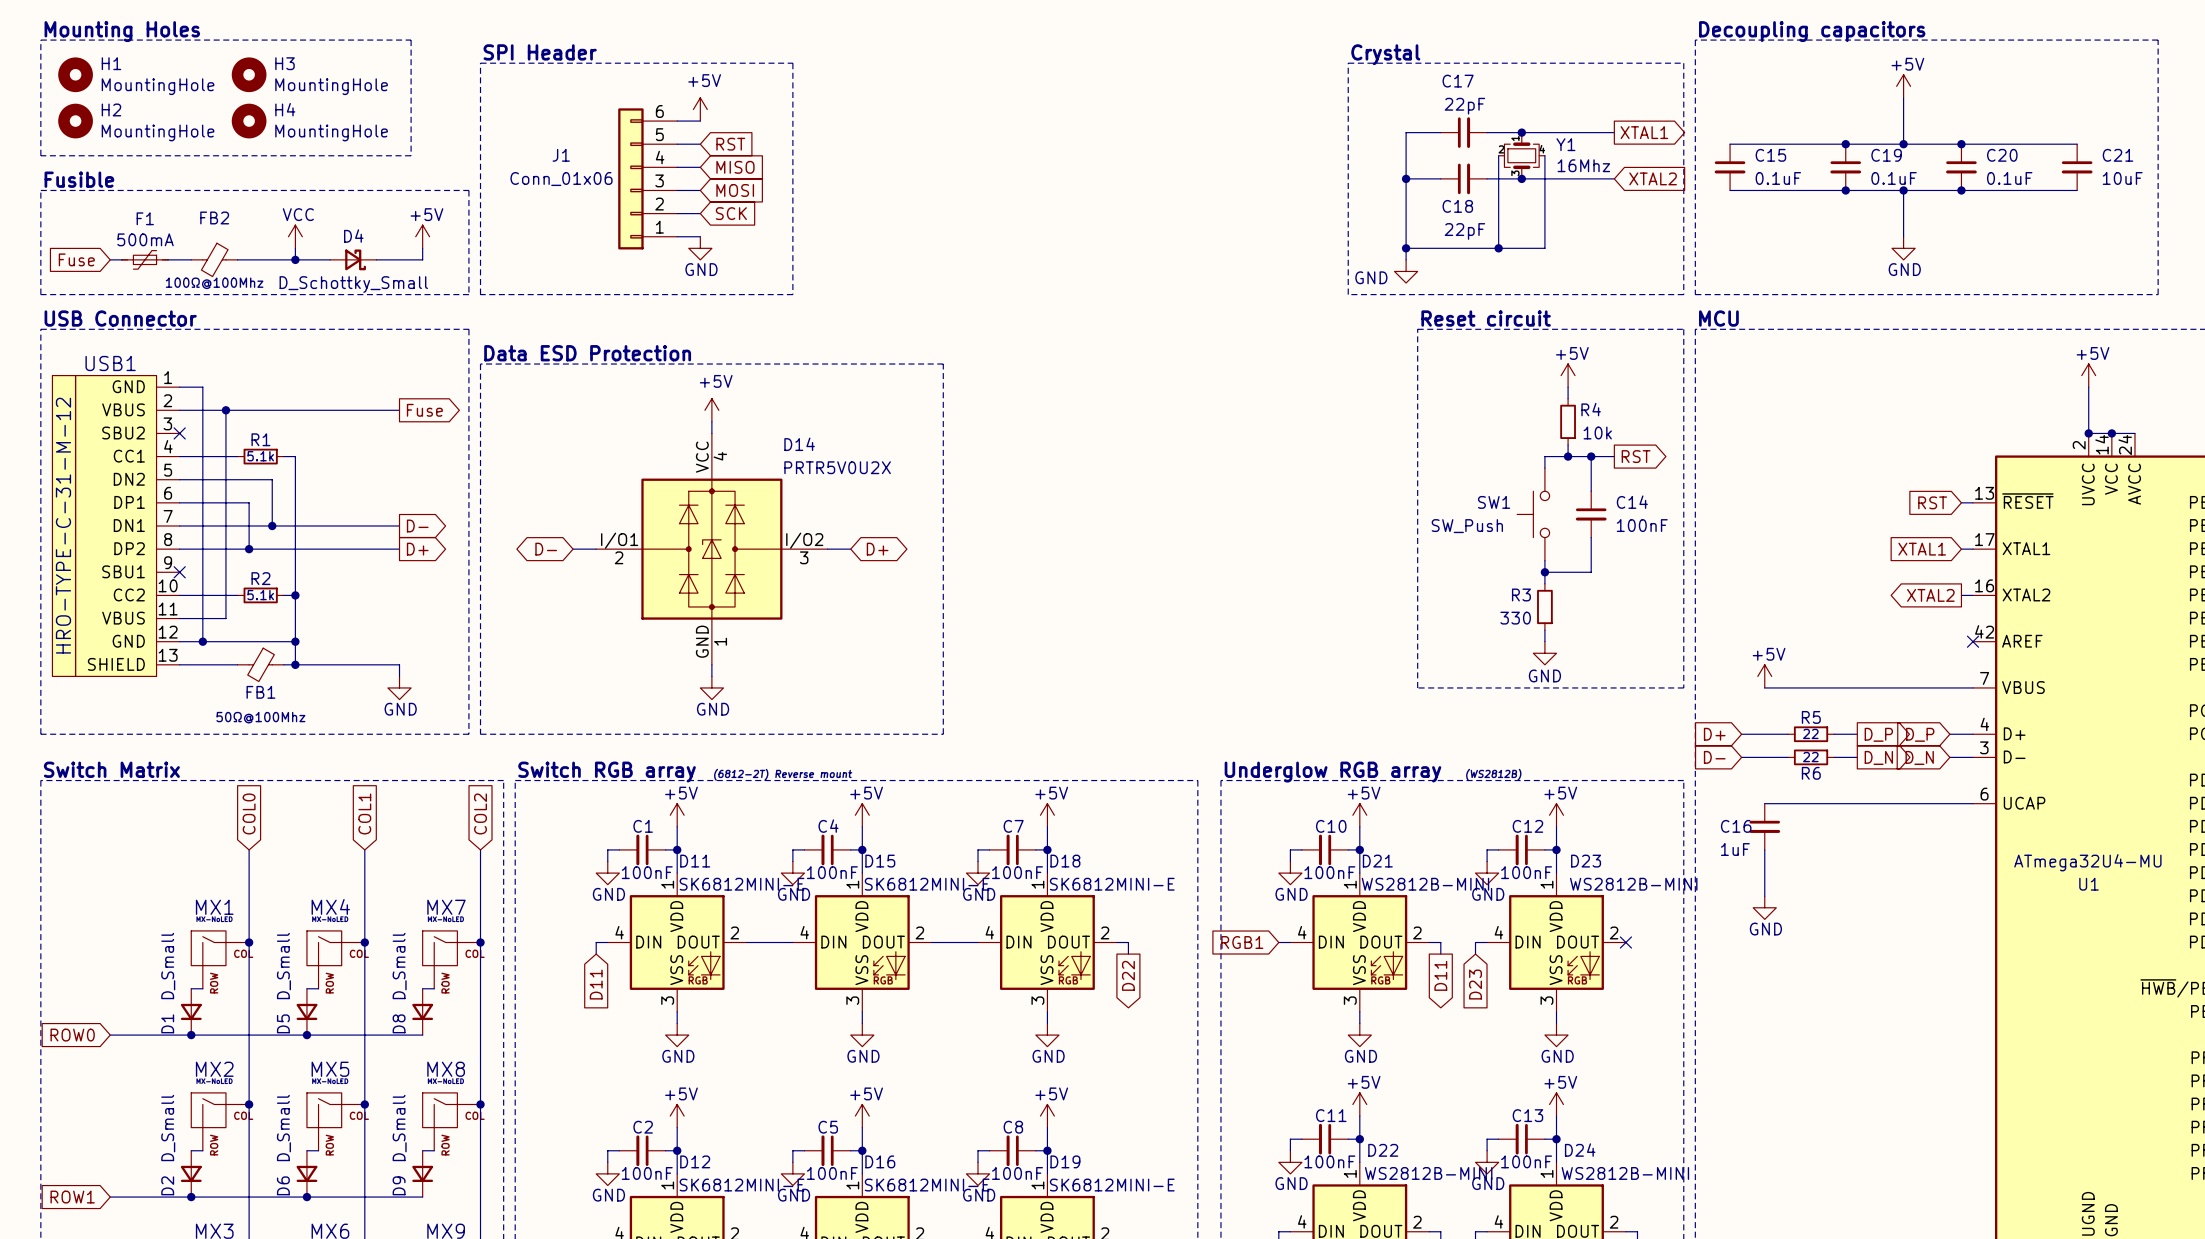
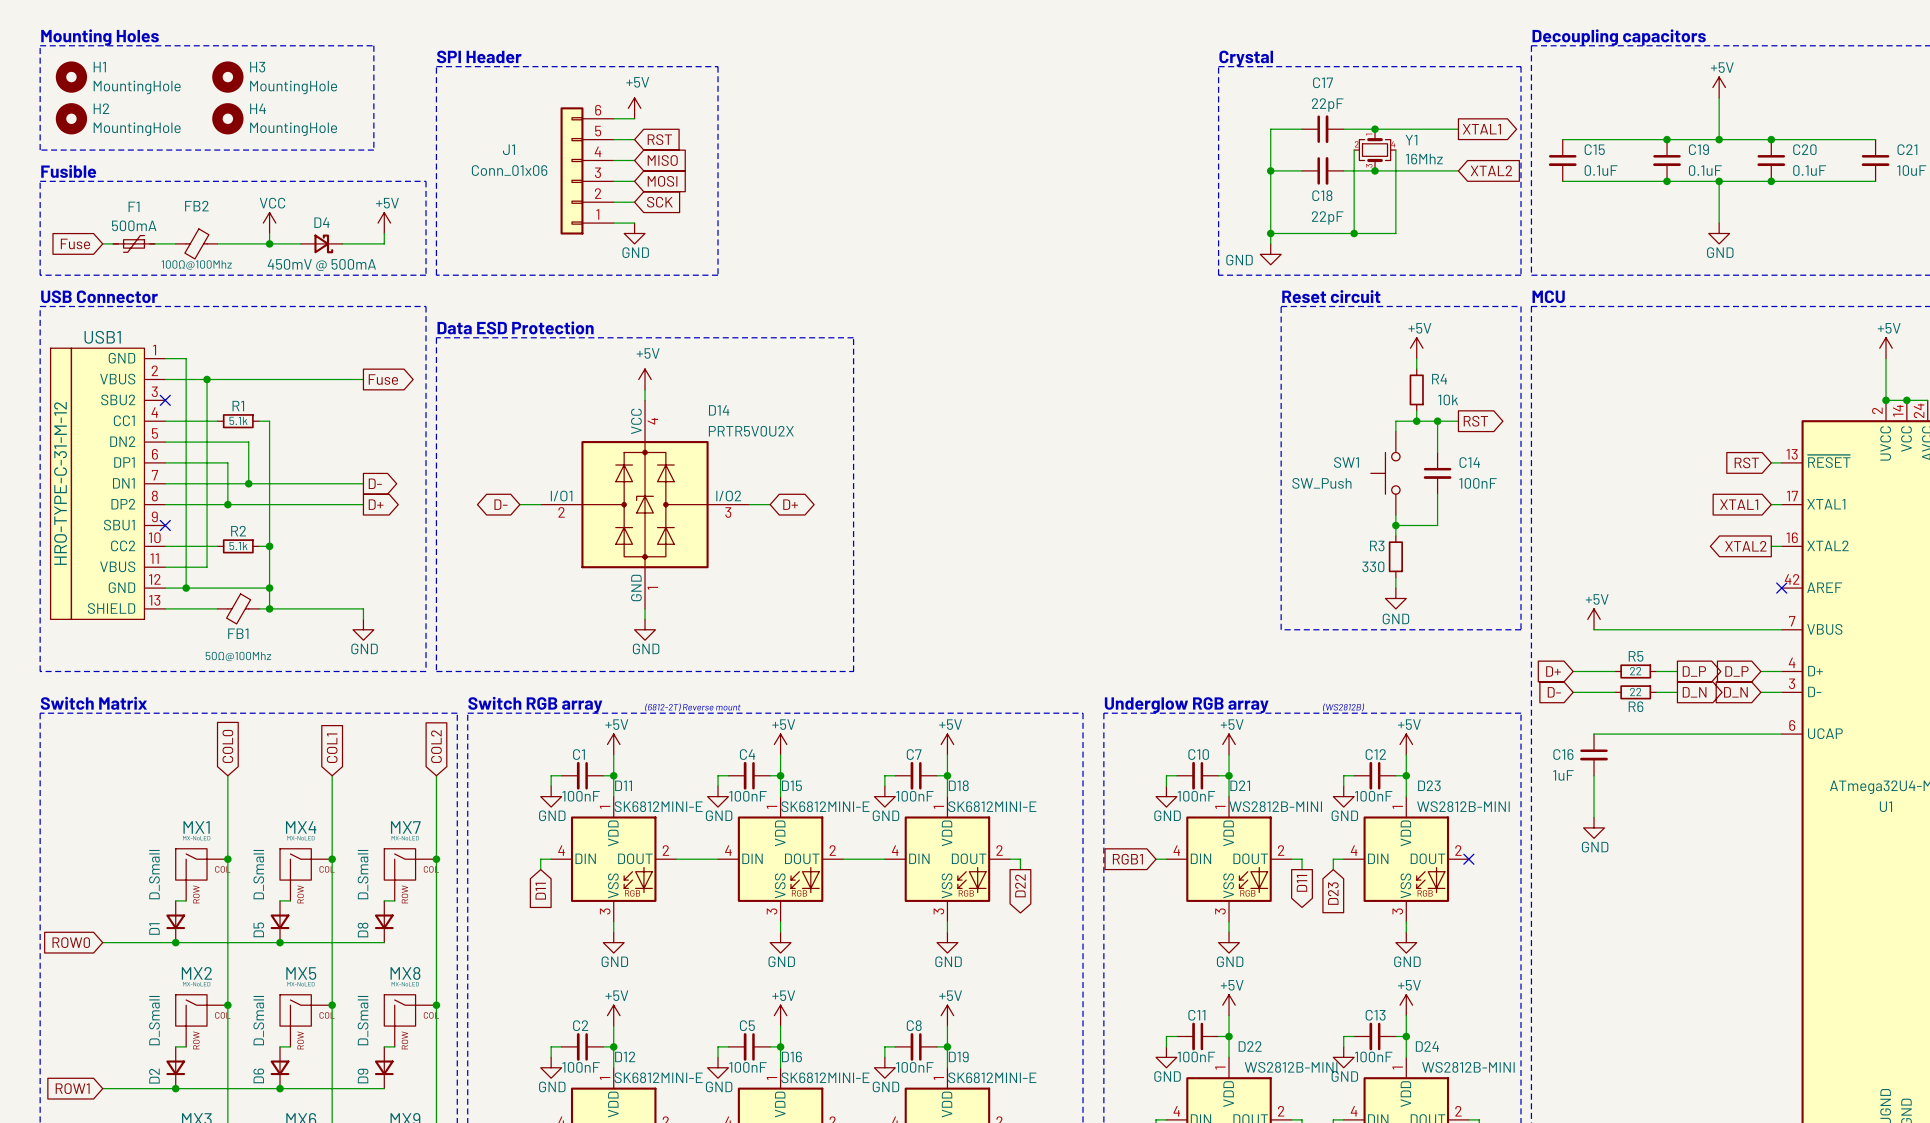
D4 value: D_Schottky_Small (353, 284) -> 450mV @ 500mA (321, 265)

